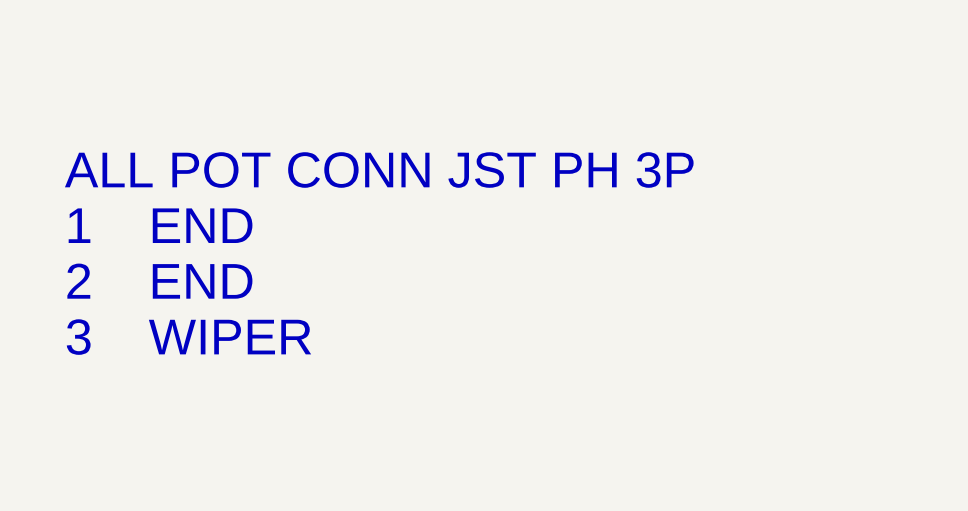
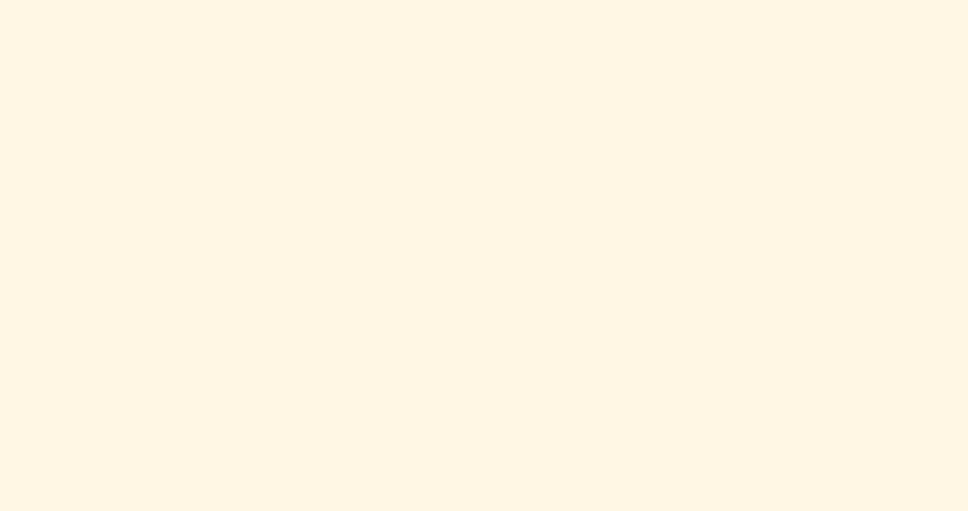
text: ALL POT CONN JST PH 3P (379, 170) -> none
text: 1 END (160, 225) -> none
text: 2 END (159, 281) -> none
text: 3 WIPER (188, 337) -> none

